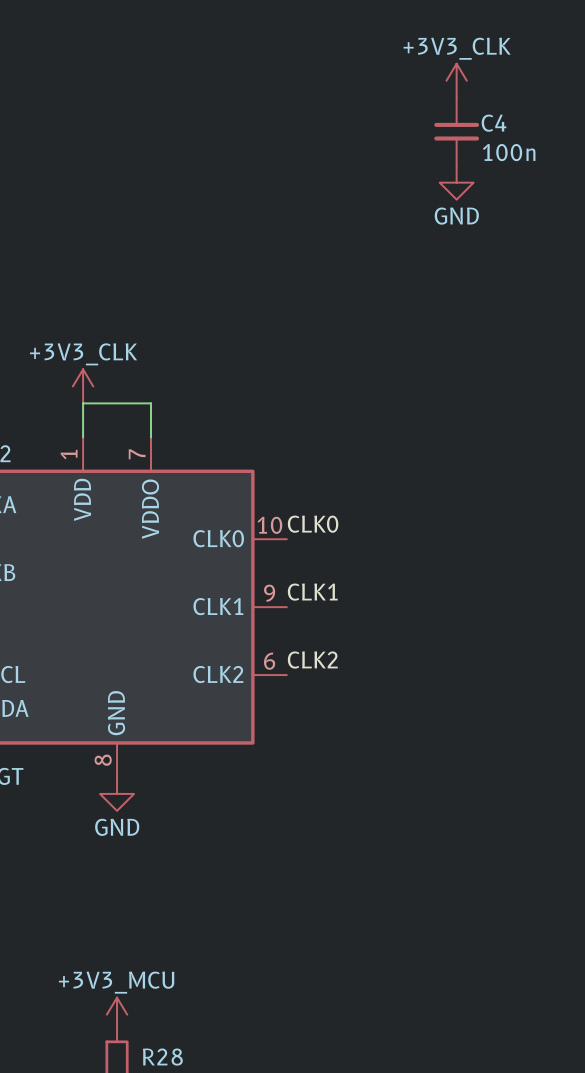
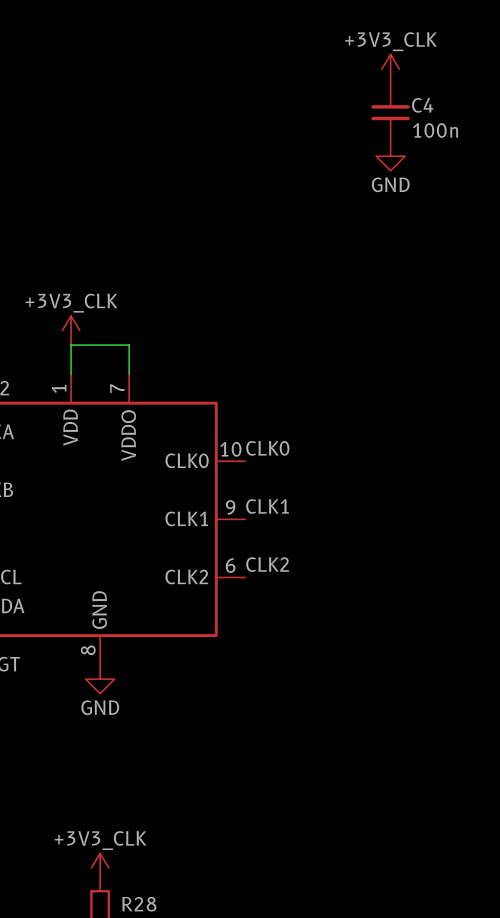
power symbol: +3V3_MCU (117, 1014) -> +3V3_CLK (100, 867)

